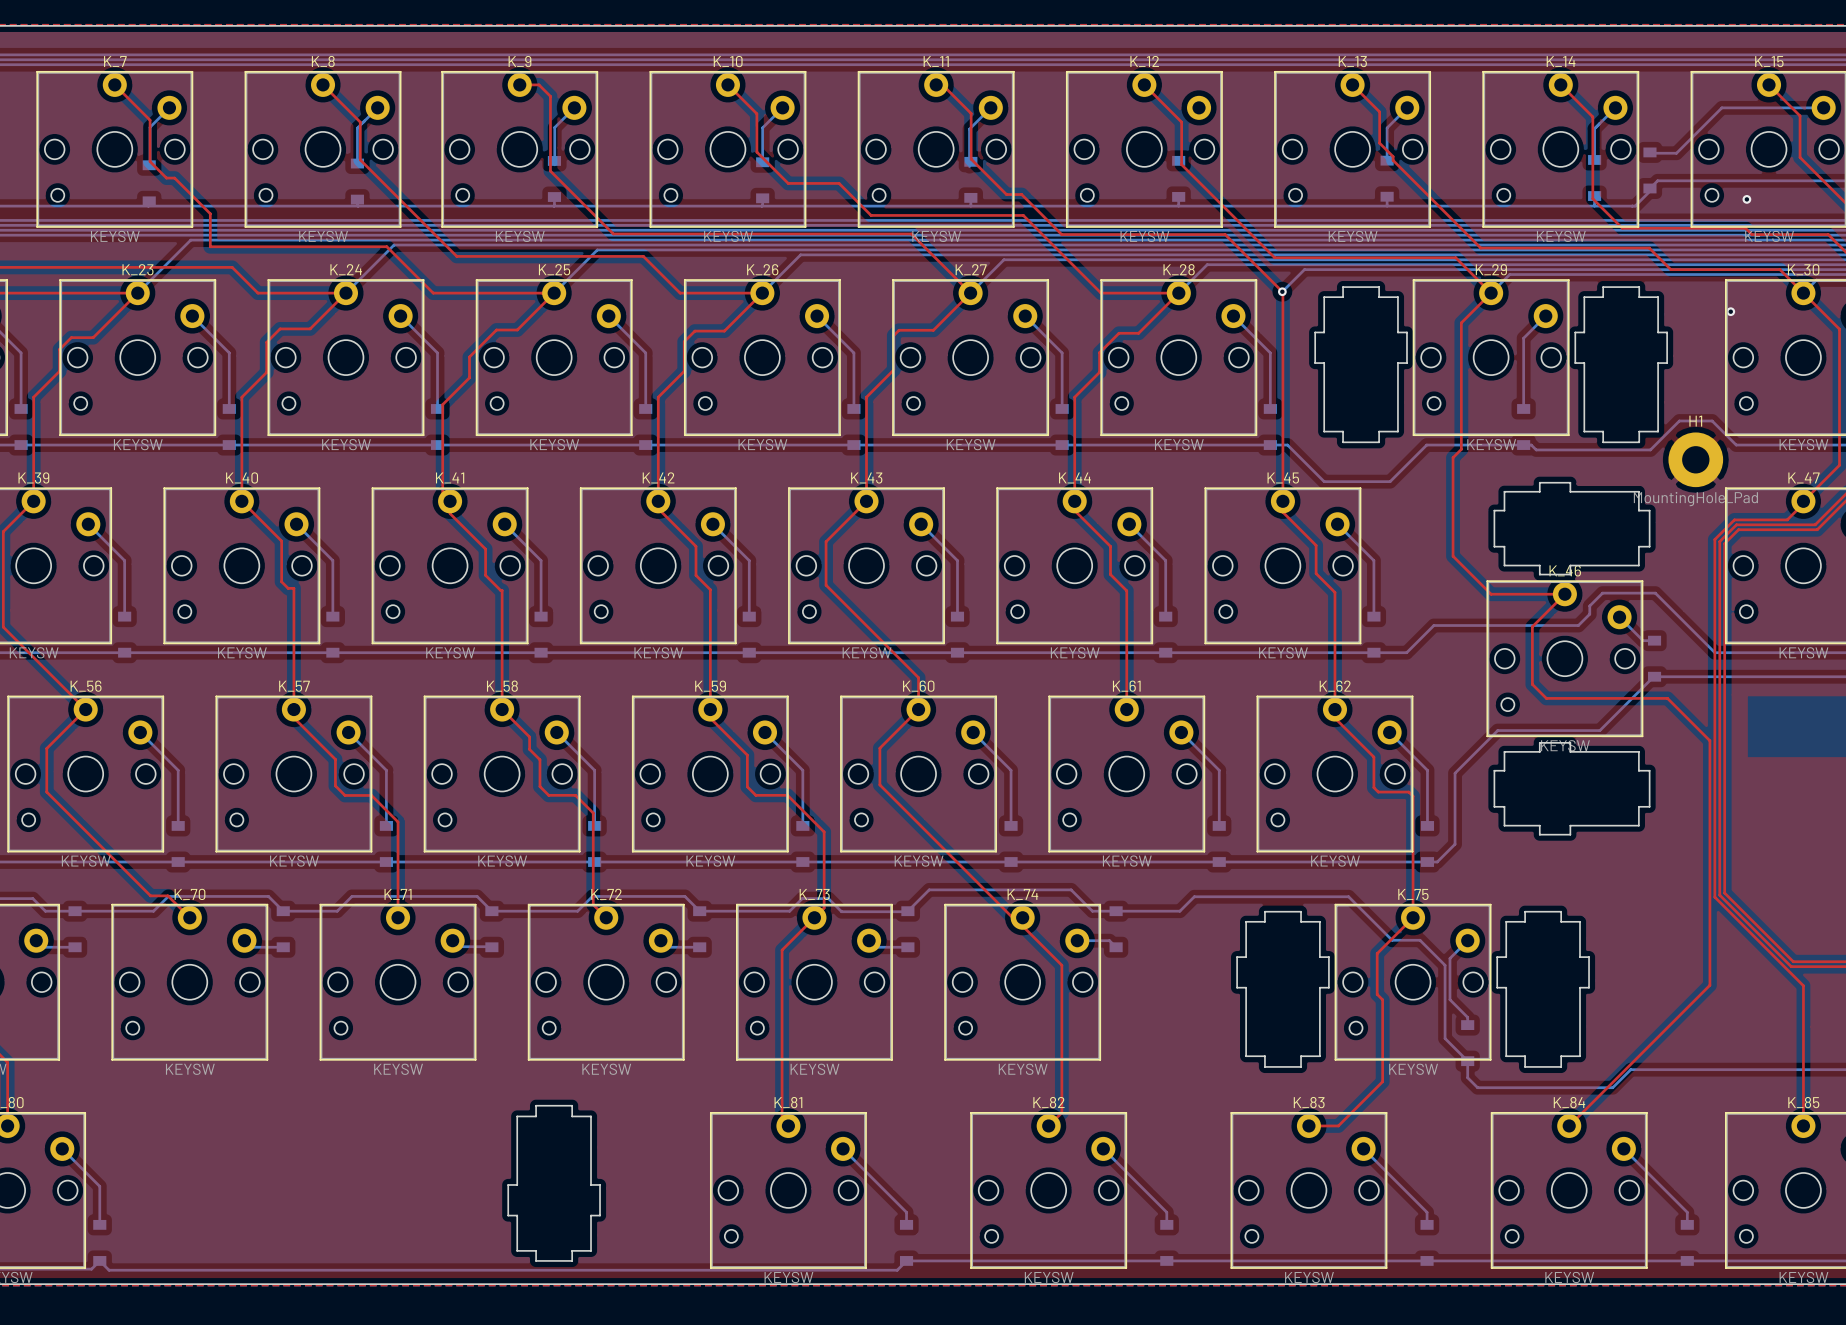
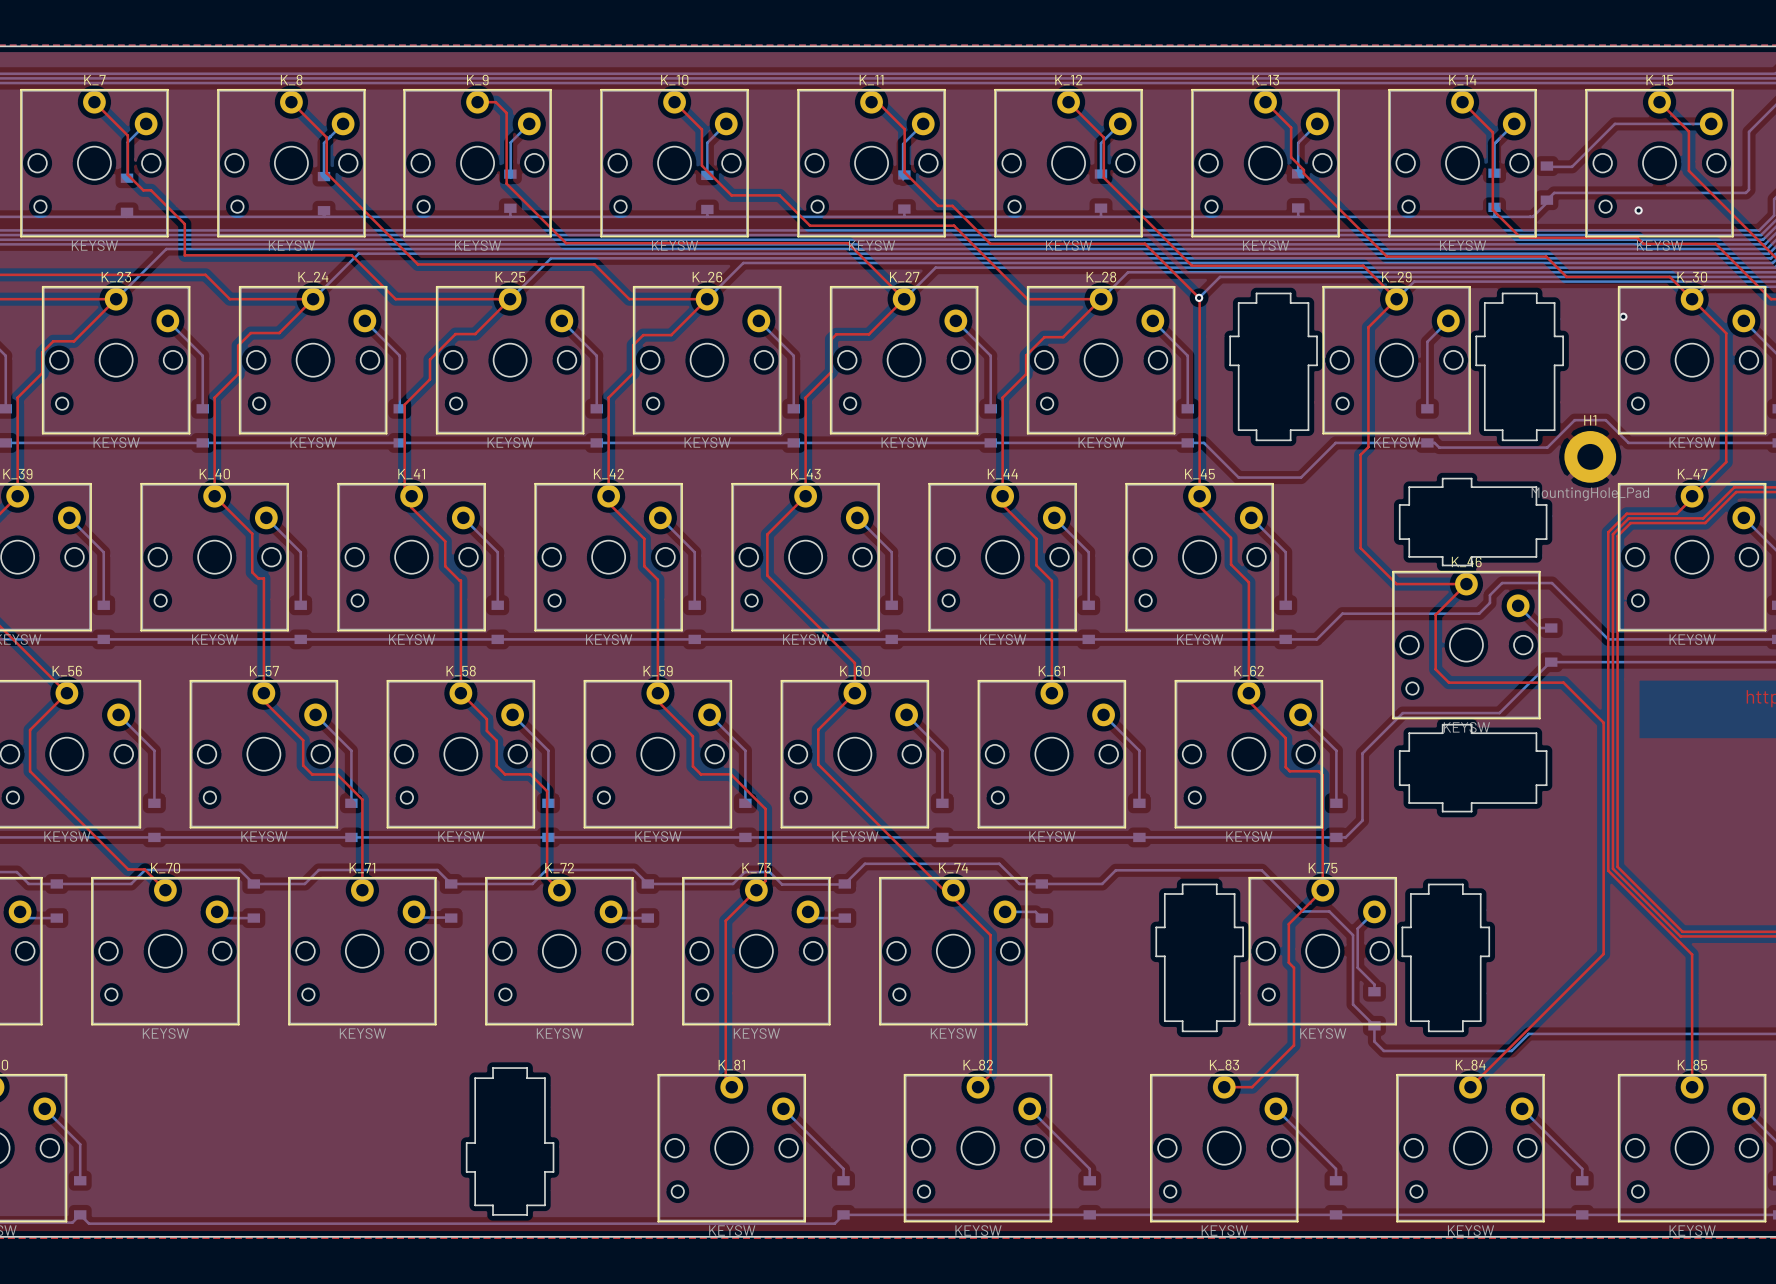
bottom track: none -> (1120, 123) (1100, 143) (1100, 174)

